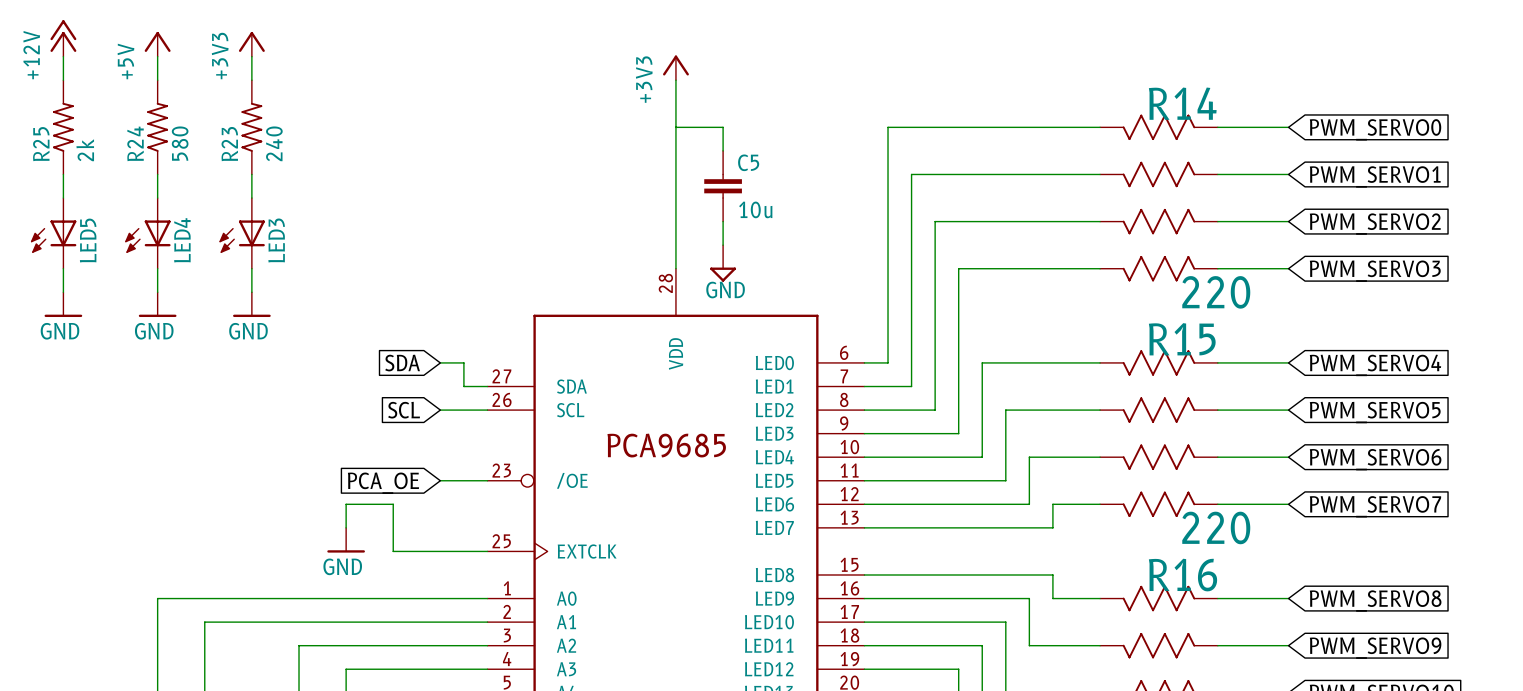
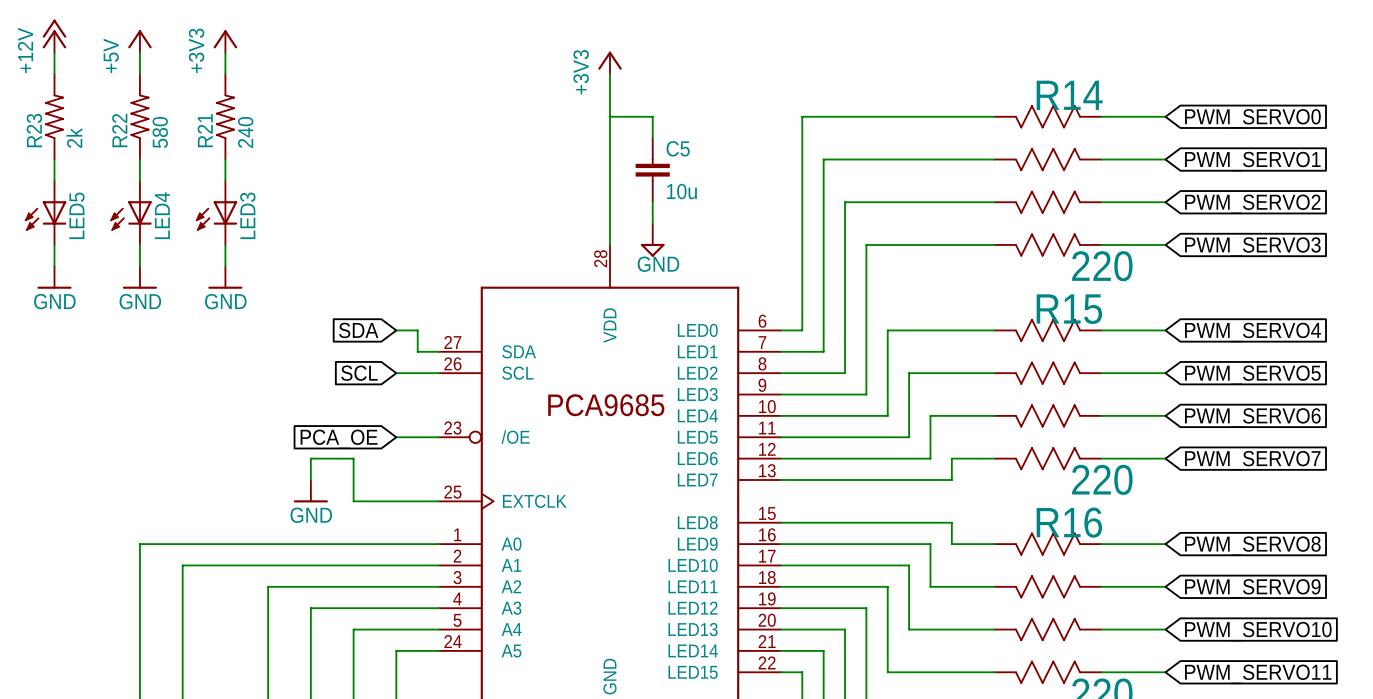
R24 name: R24 (135, 143) -> R22 (119, 130)
R25 name: R25 (41, 144) -> R23 (34, 130)
R23 name: R23 (229, 144) -> R21 (205, 130)

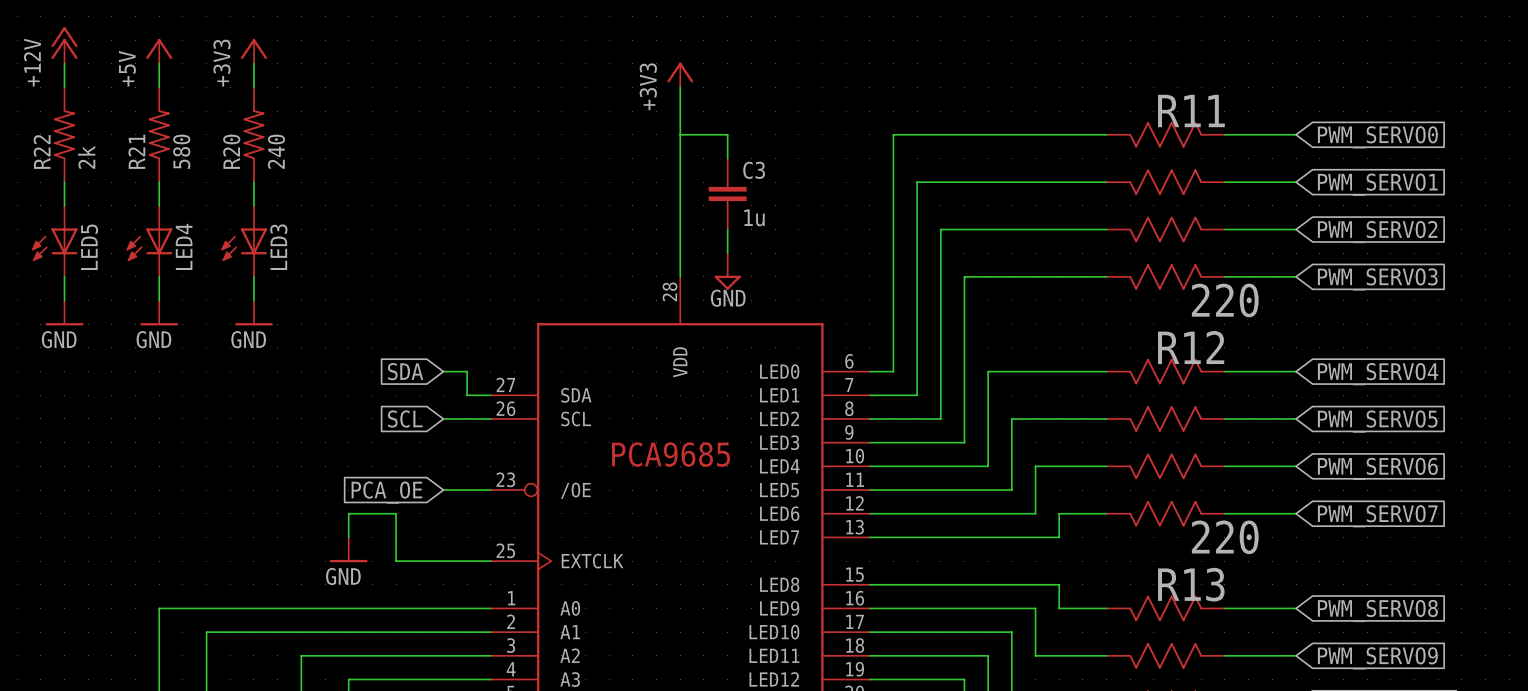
R14 name: R14 (1069, 95) -> R11 (1191, 110)
R23 name: R23 (34, 130) -> R22 (42, 151)
R22 name: R22 (119, 130) -> R21 (136, 151)
R21 name: R21 (205, 130) -> R20 (231, 151)
C5 name: C5 (678, 148) -> C3 (754, 170)
C5 value: 10u (681, 191) -> 1u (754, 217)
R15 name: R15 (1069, 309) -> R12 (1191, 347)
R16 name: R16 (1069, 522) -> R13 (1191, 584)

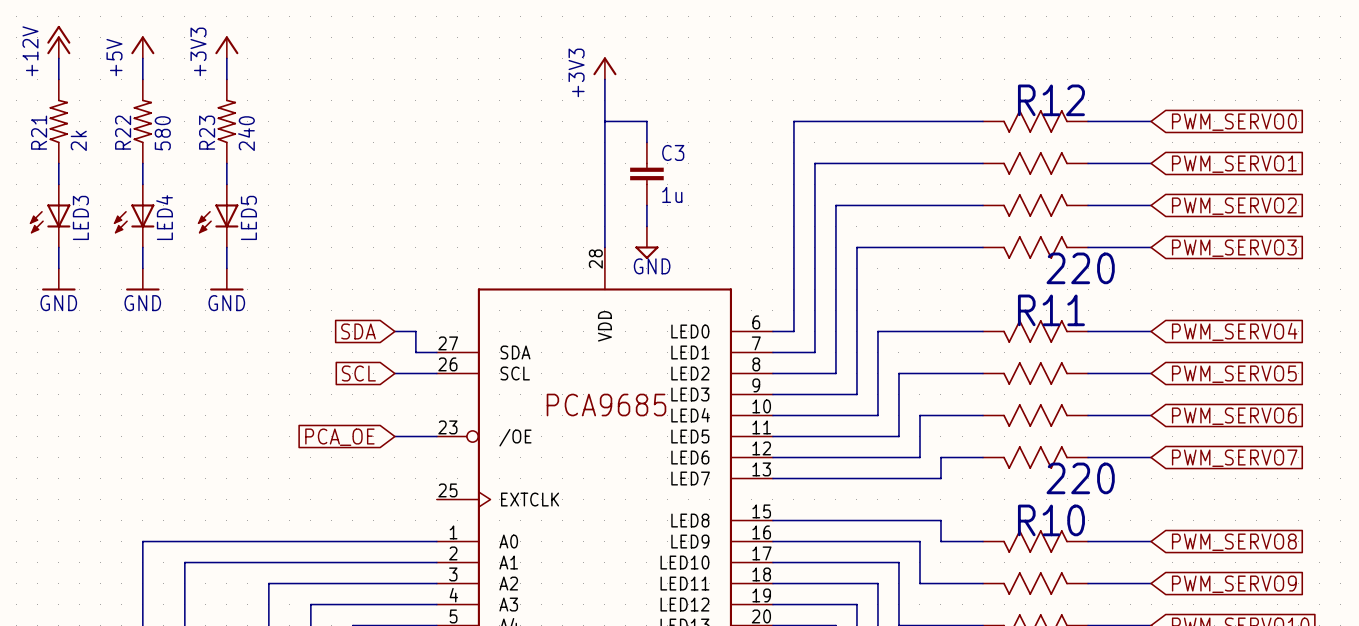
R11 name: R11 (1191, 110) -> R12 (1051, 100)
R22 name: R22 (42, 151) -> R21 (39, 132)
R21 name: R21 (136, 151) -> R22 (123, 132)
R20 name: R20 (231, 151) -> R23 (207, 132)
LED5 name: LED5 (89, 247) -> LED3 (80, 217)
LED3 name: LED3 (278, 247) -> LED5 (248, 217)
R12 name: R12 (1191, 347) -> R11 (1051, 310)
wire: (348, 537) (348, 513) (396, 513) (396, 561) (490, 561) -> none
power symbol: GND (348, 549) -> none
R13 name: R13 (1191, 584) -> R10 (1051, 520)

